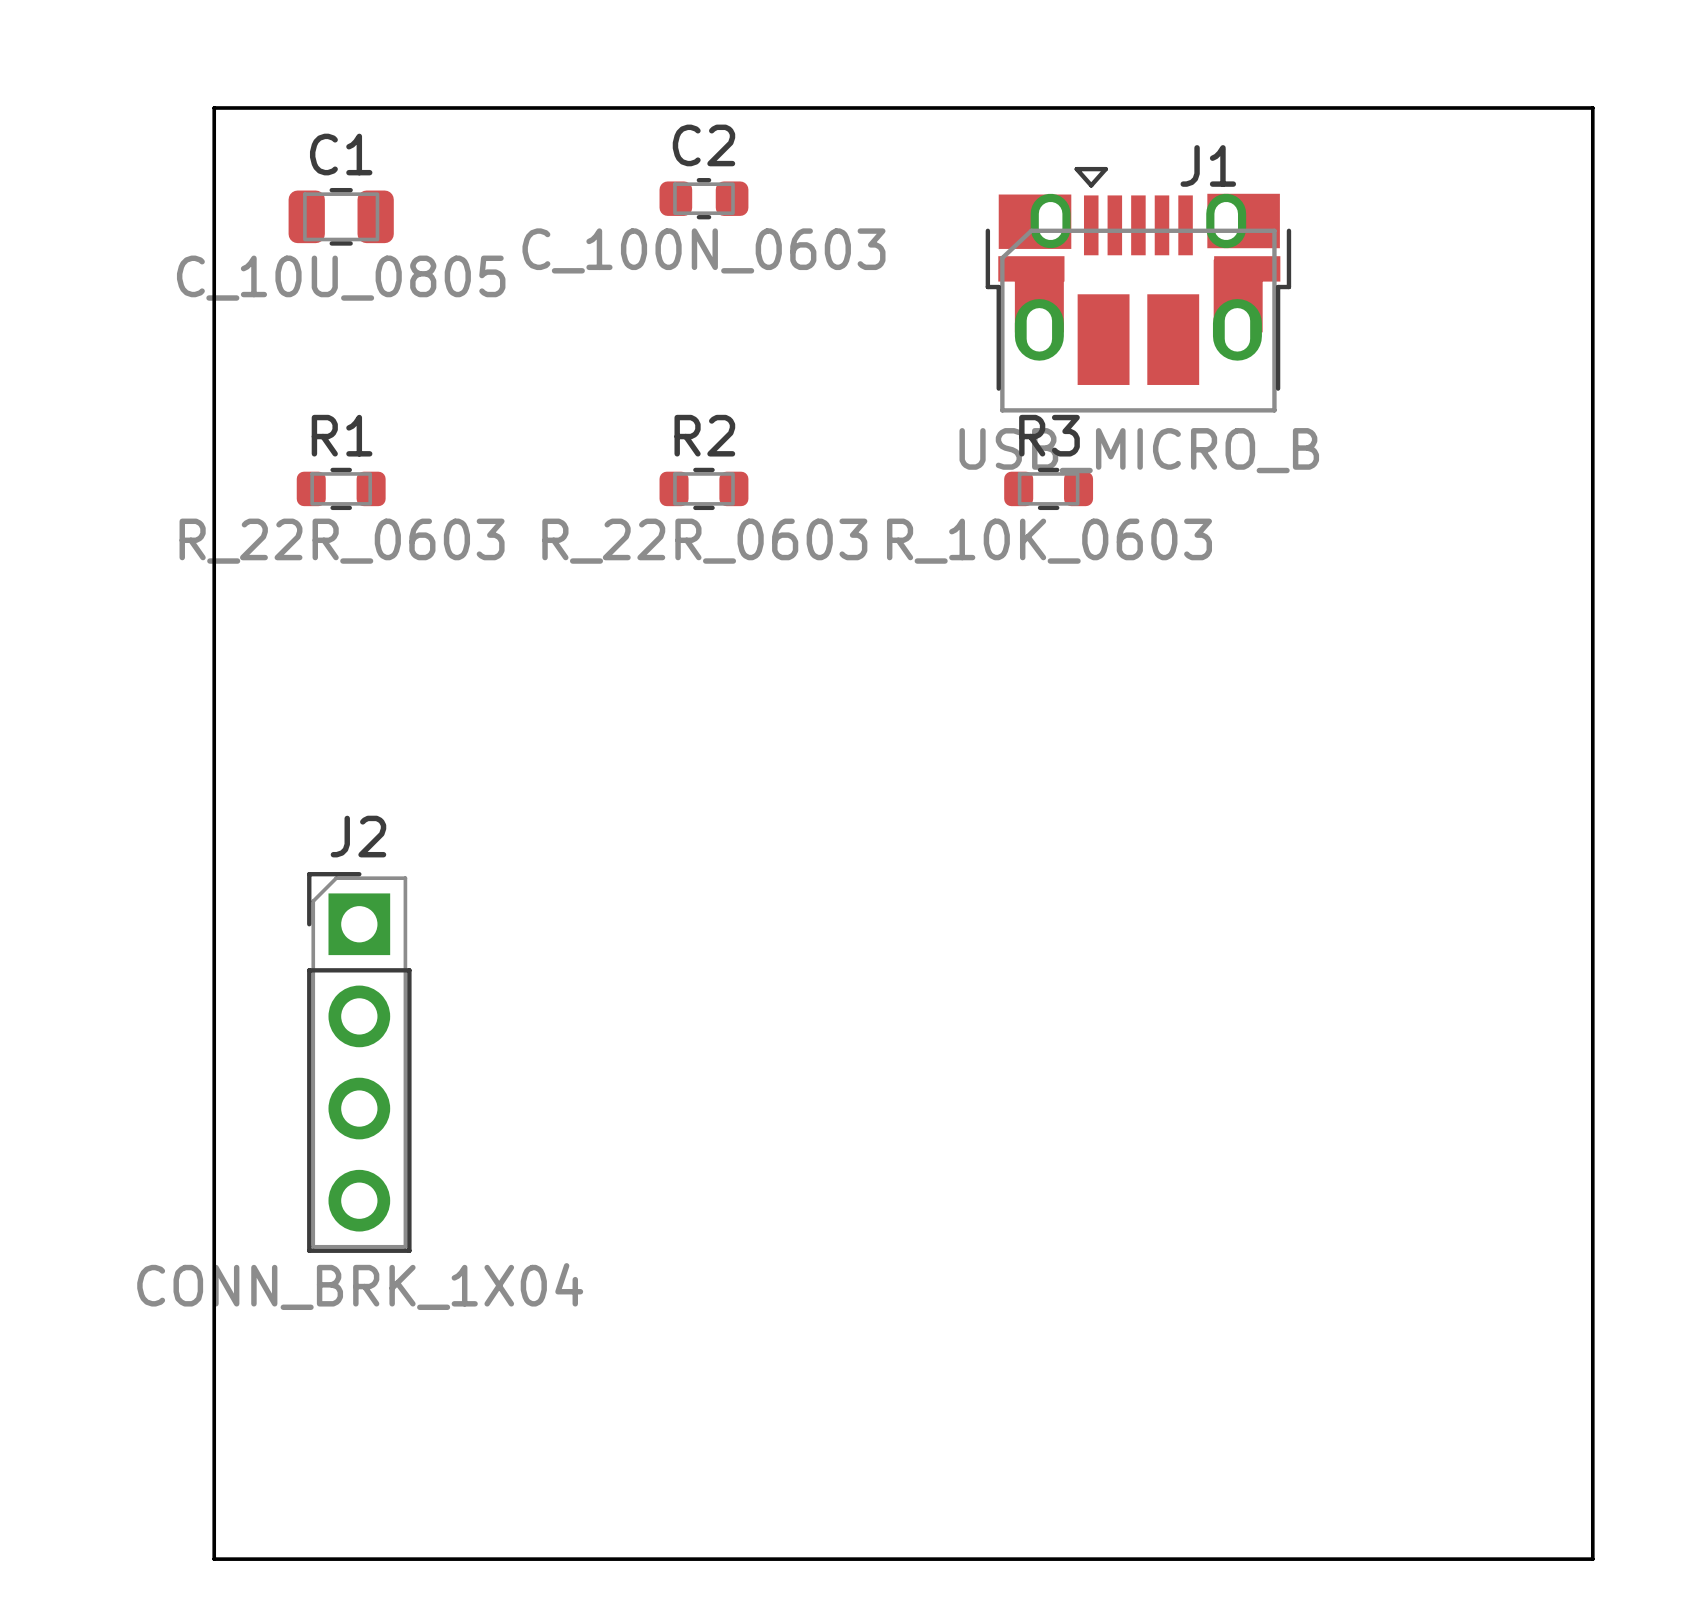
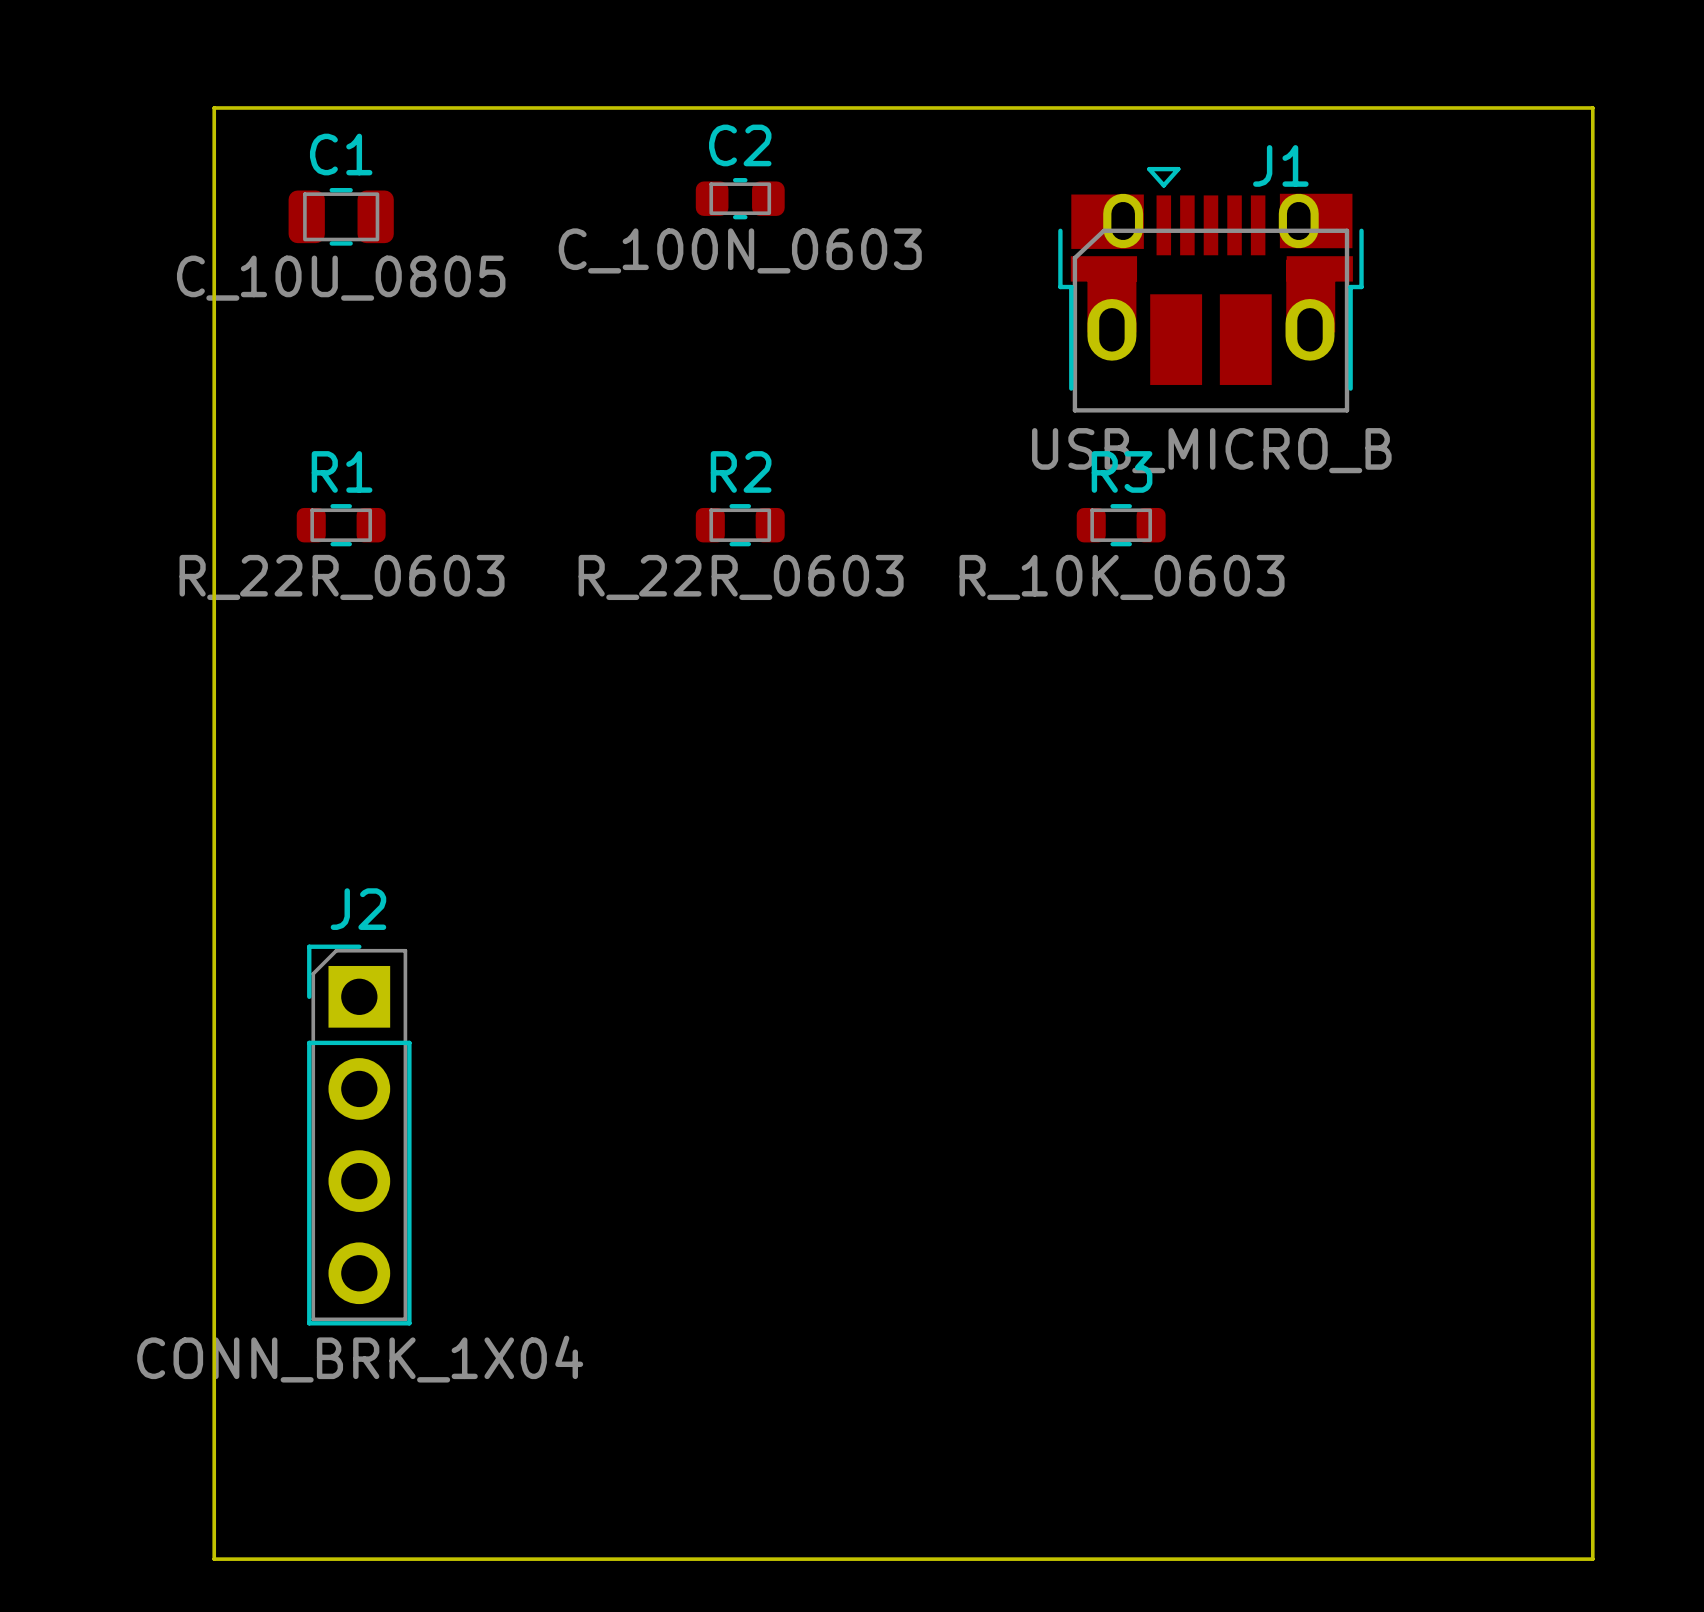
C2 position: (703, 198) -> (740, 198)
J1 position: (1138, 289) -> (1210, 289)
R1 position: (341, 488) -> (341, 525)
R2 position: (703, 488) -> (740, 525)
R3 position: (1048, 488) -> (1121, 525)
J2 position: (359, 1062) -> (359, 1135)

